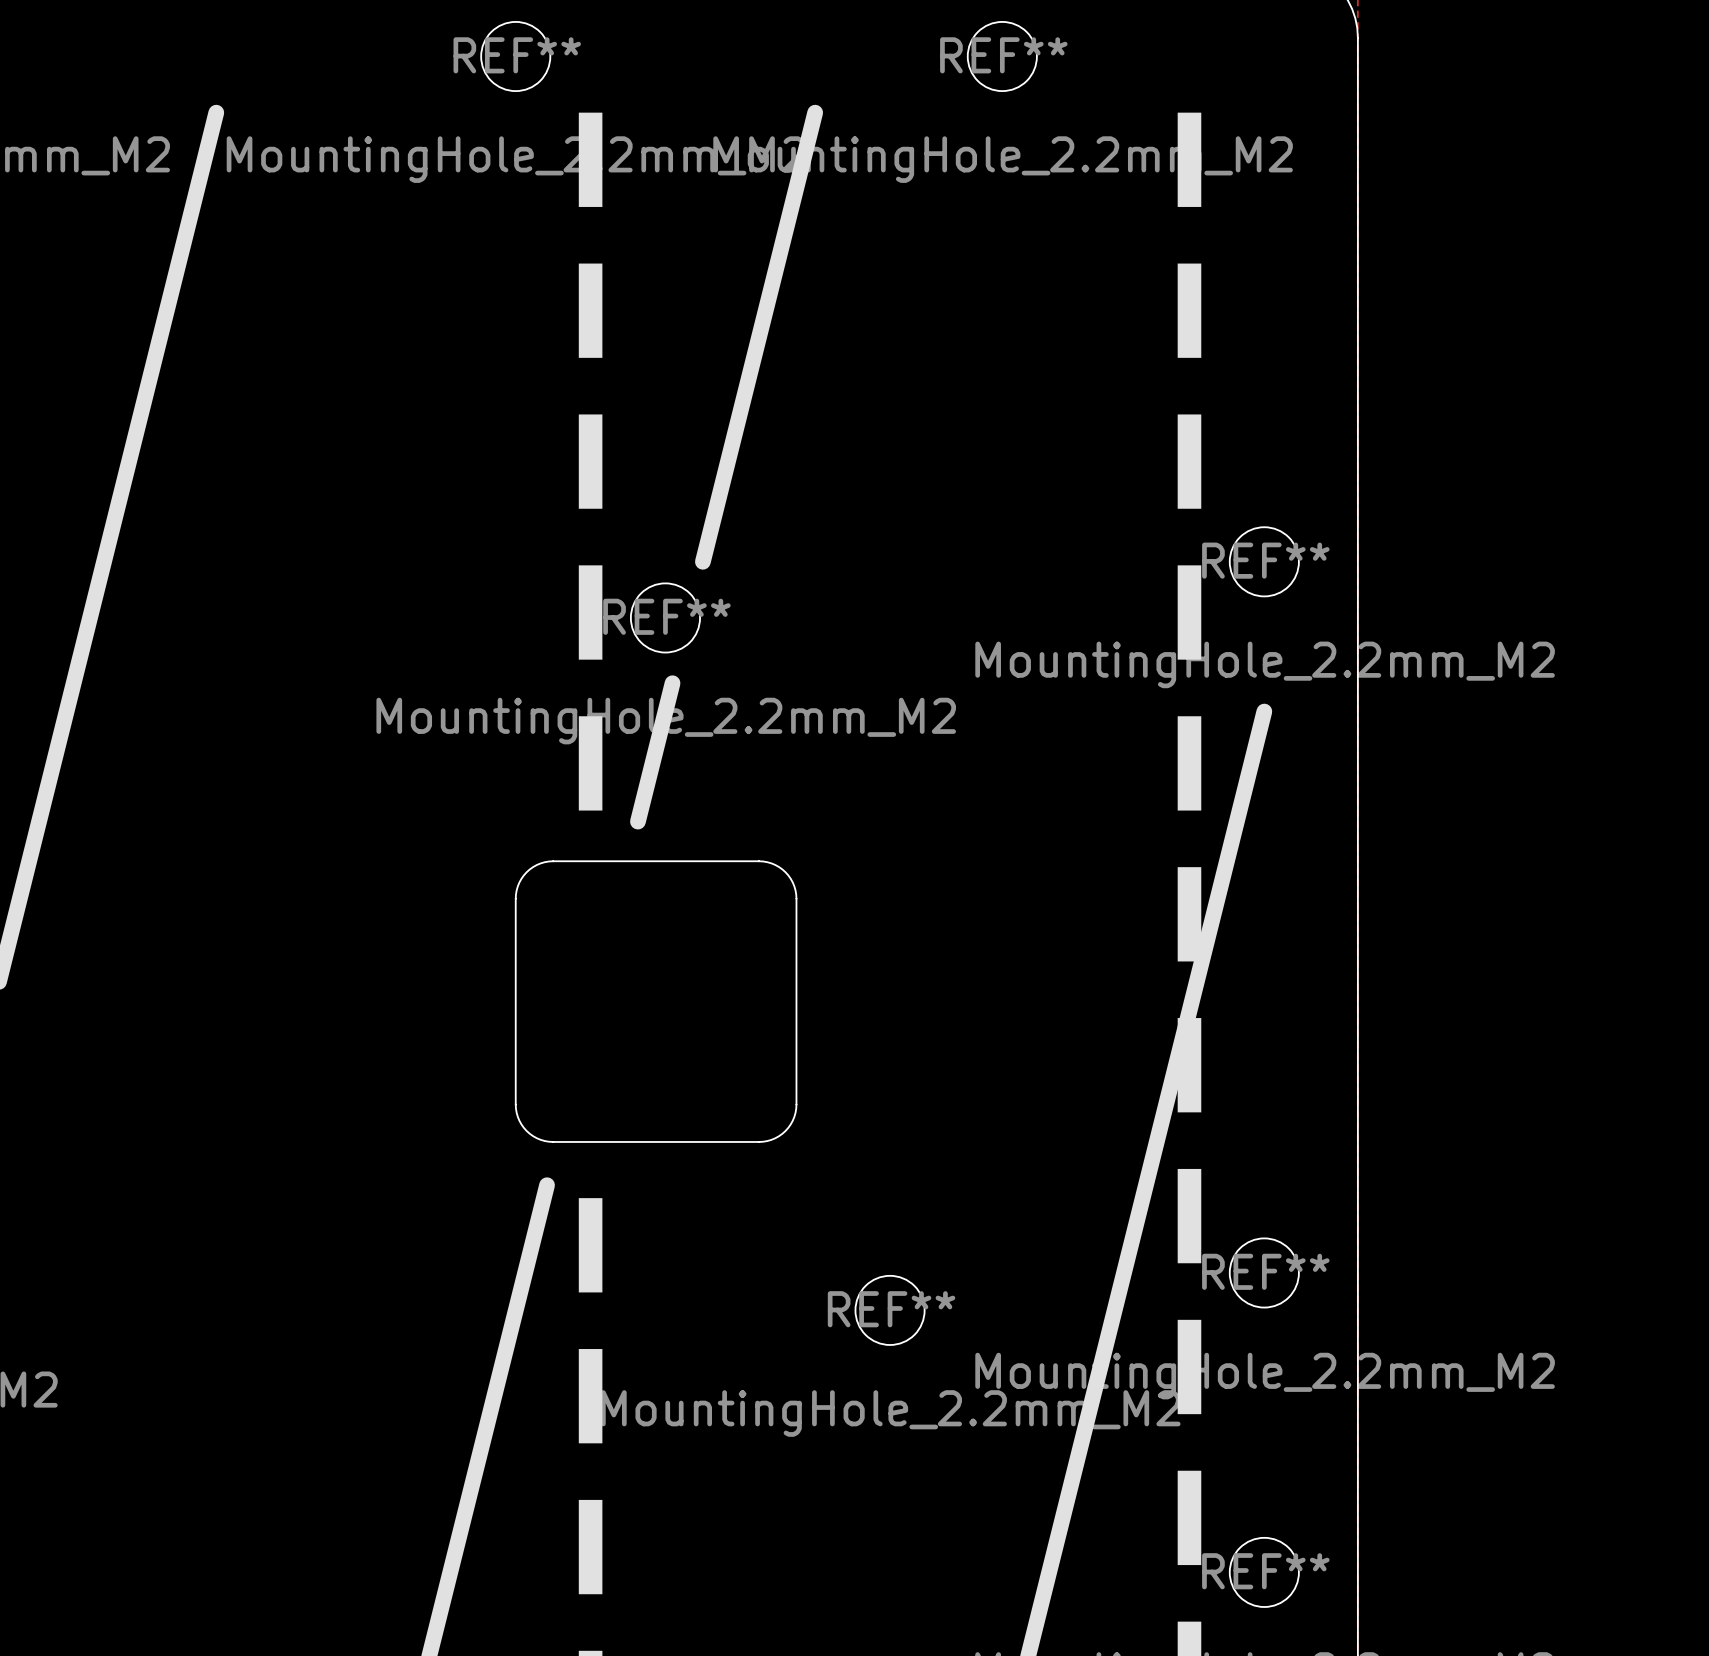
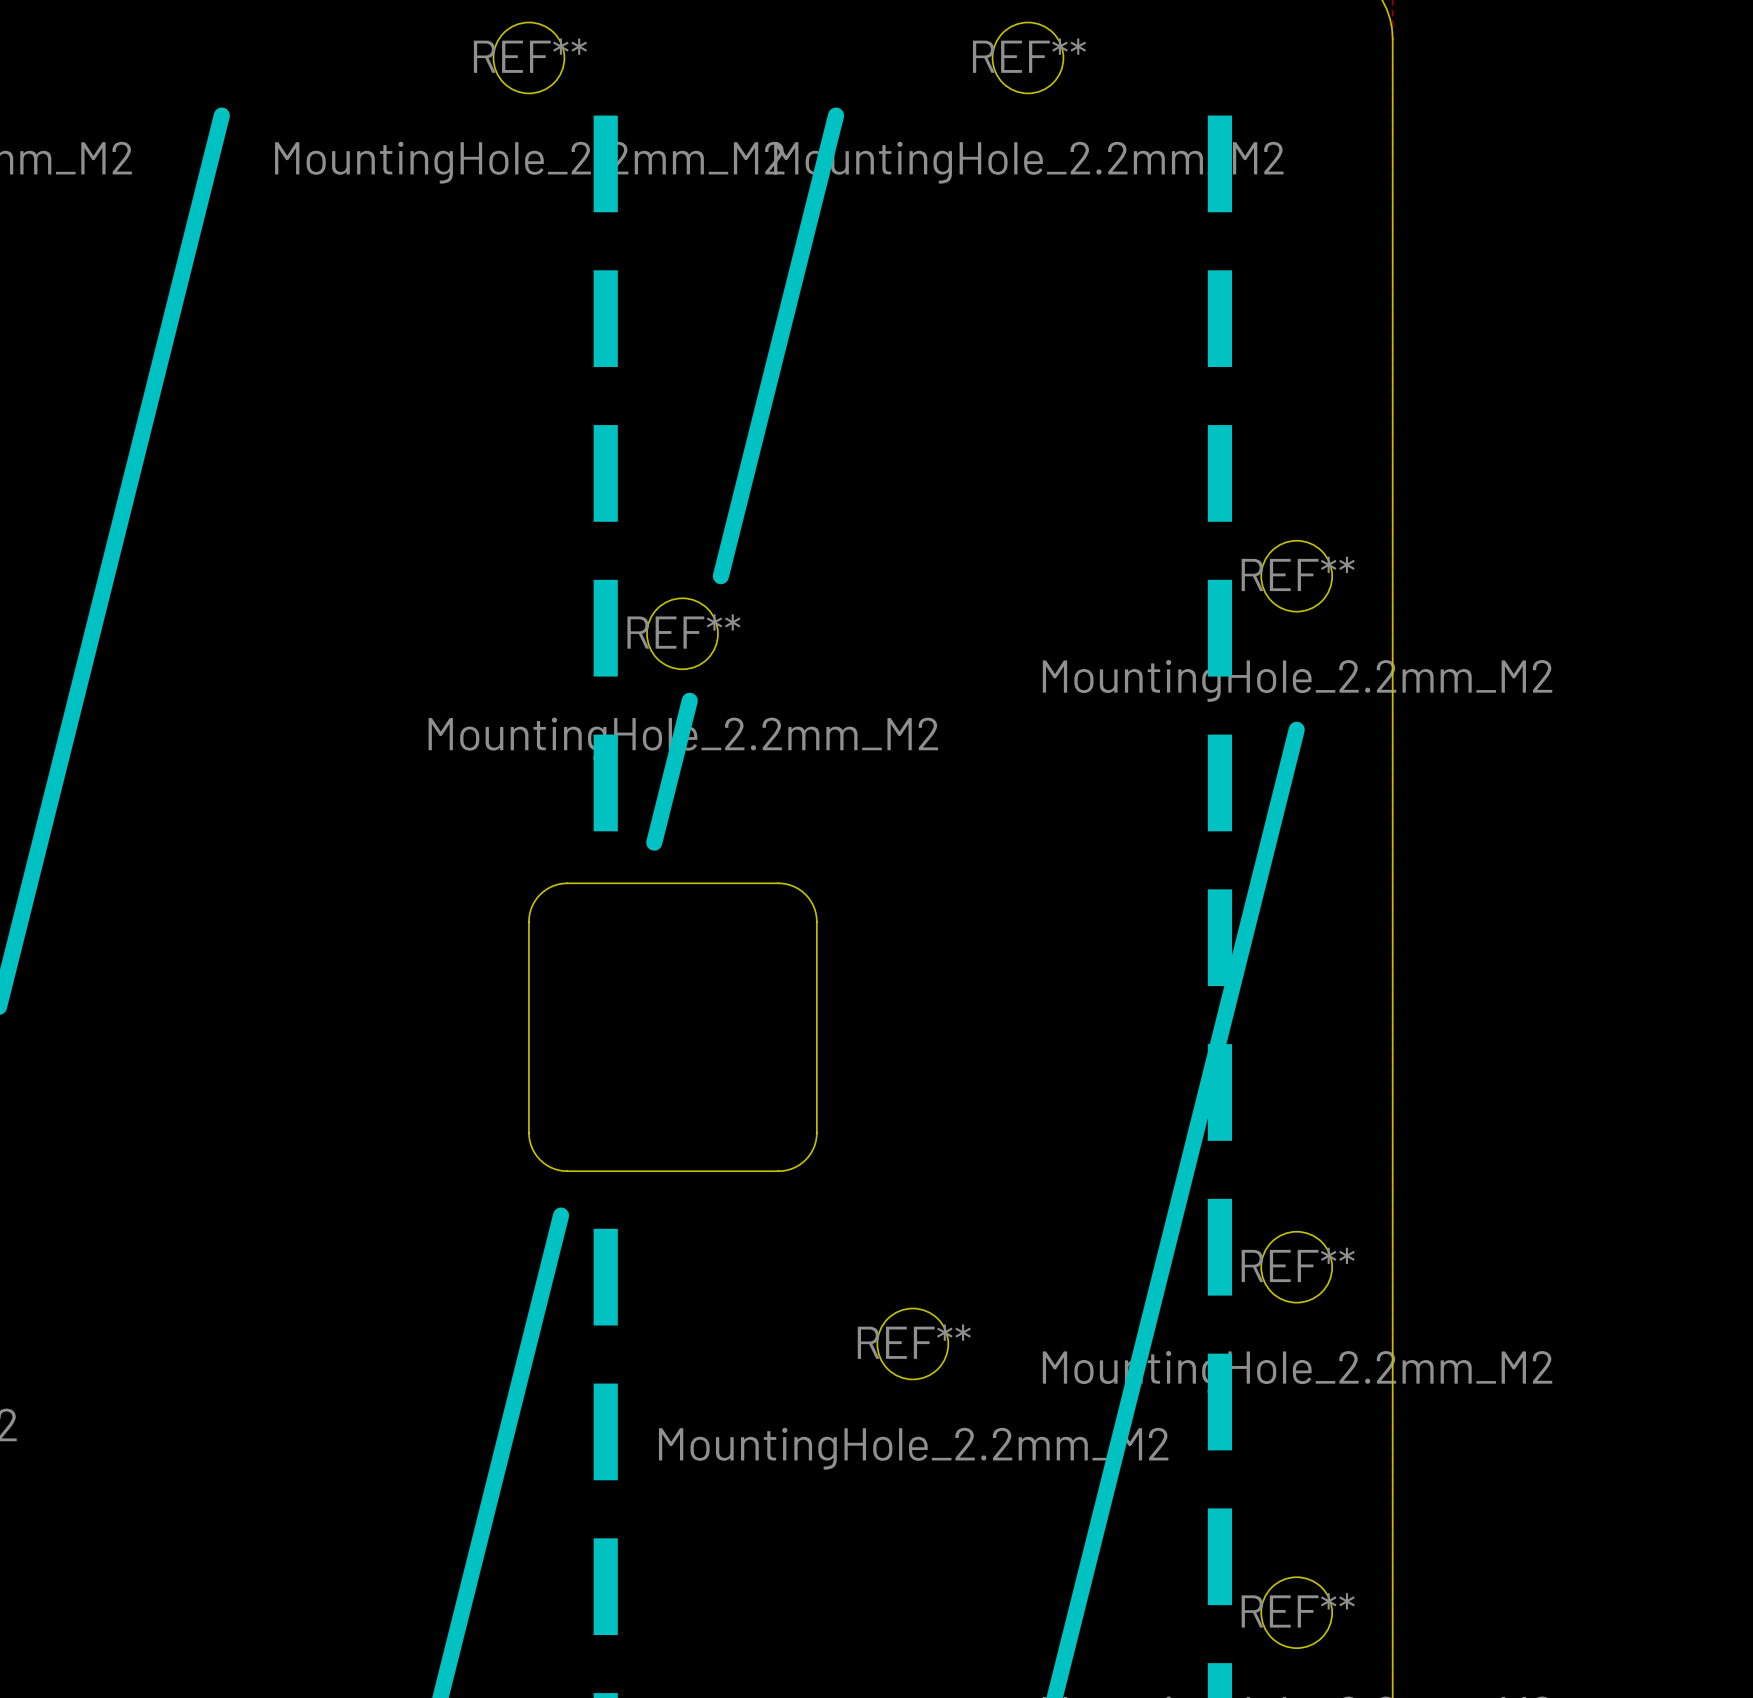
REF** position: (1264, 1272) -> (1296, 1267)

